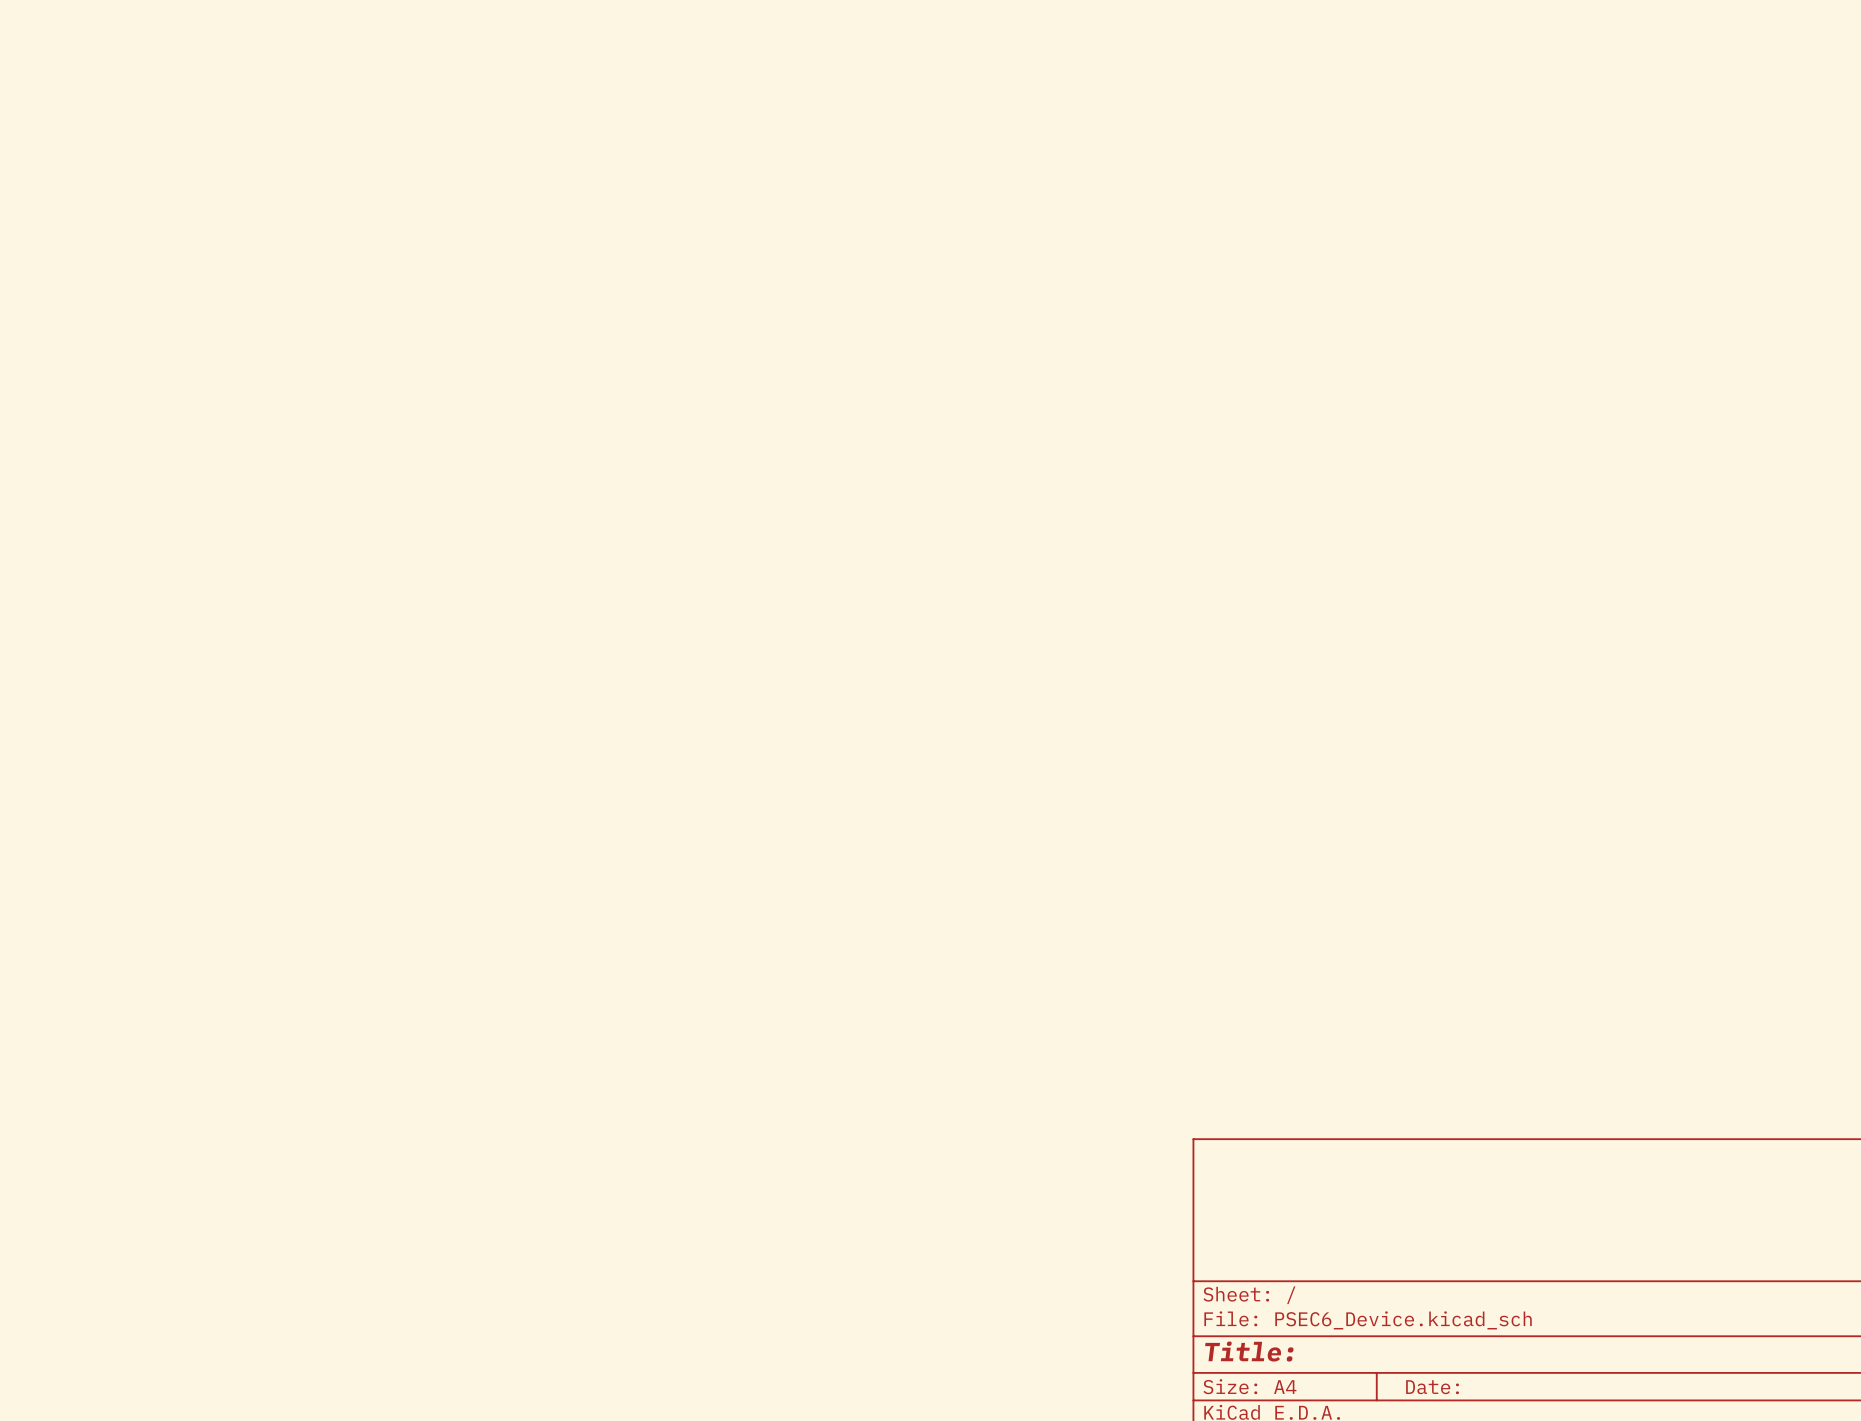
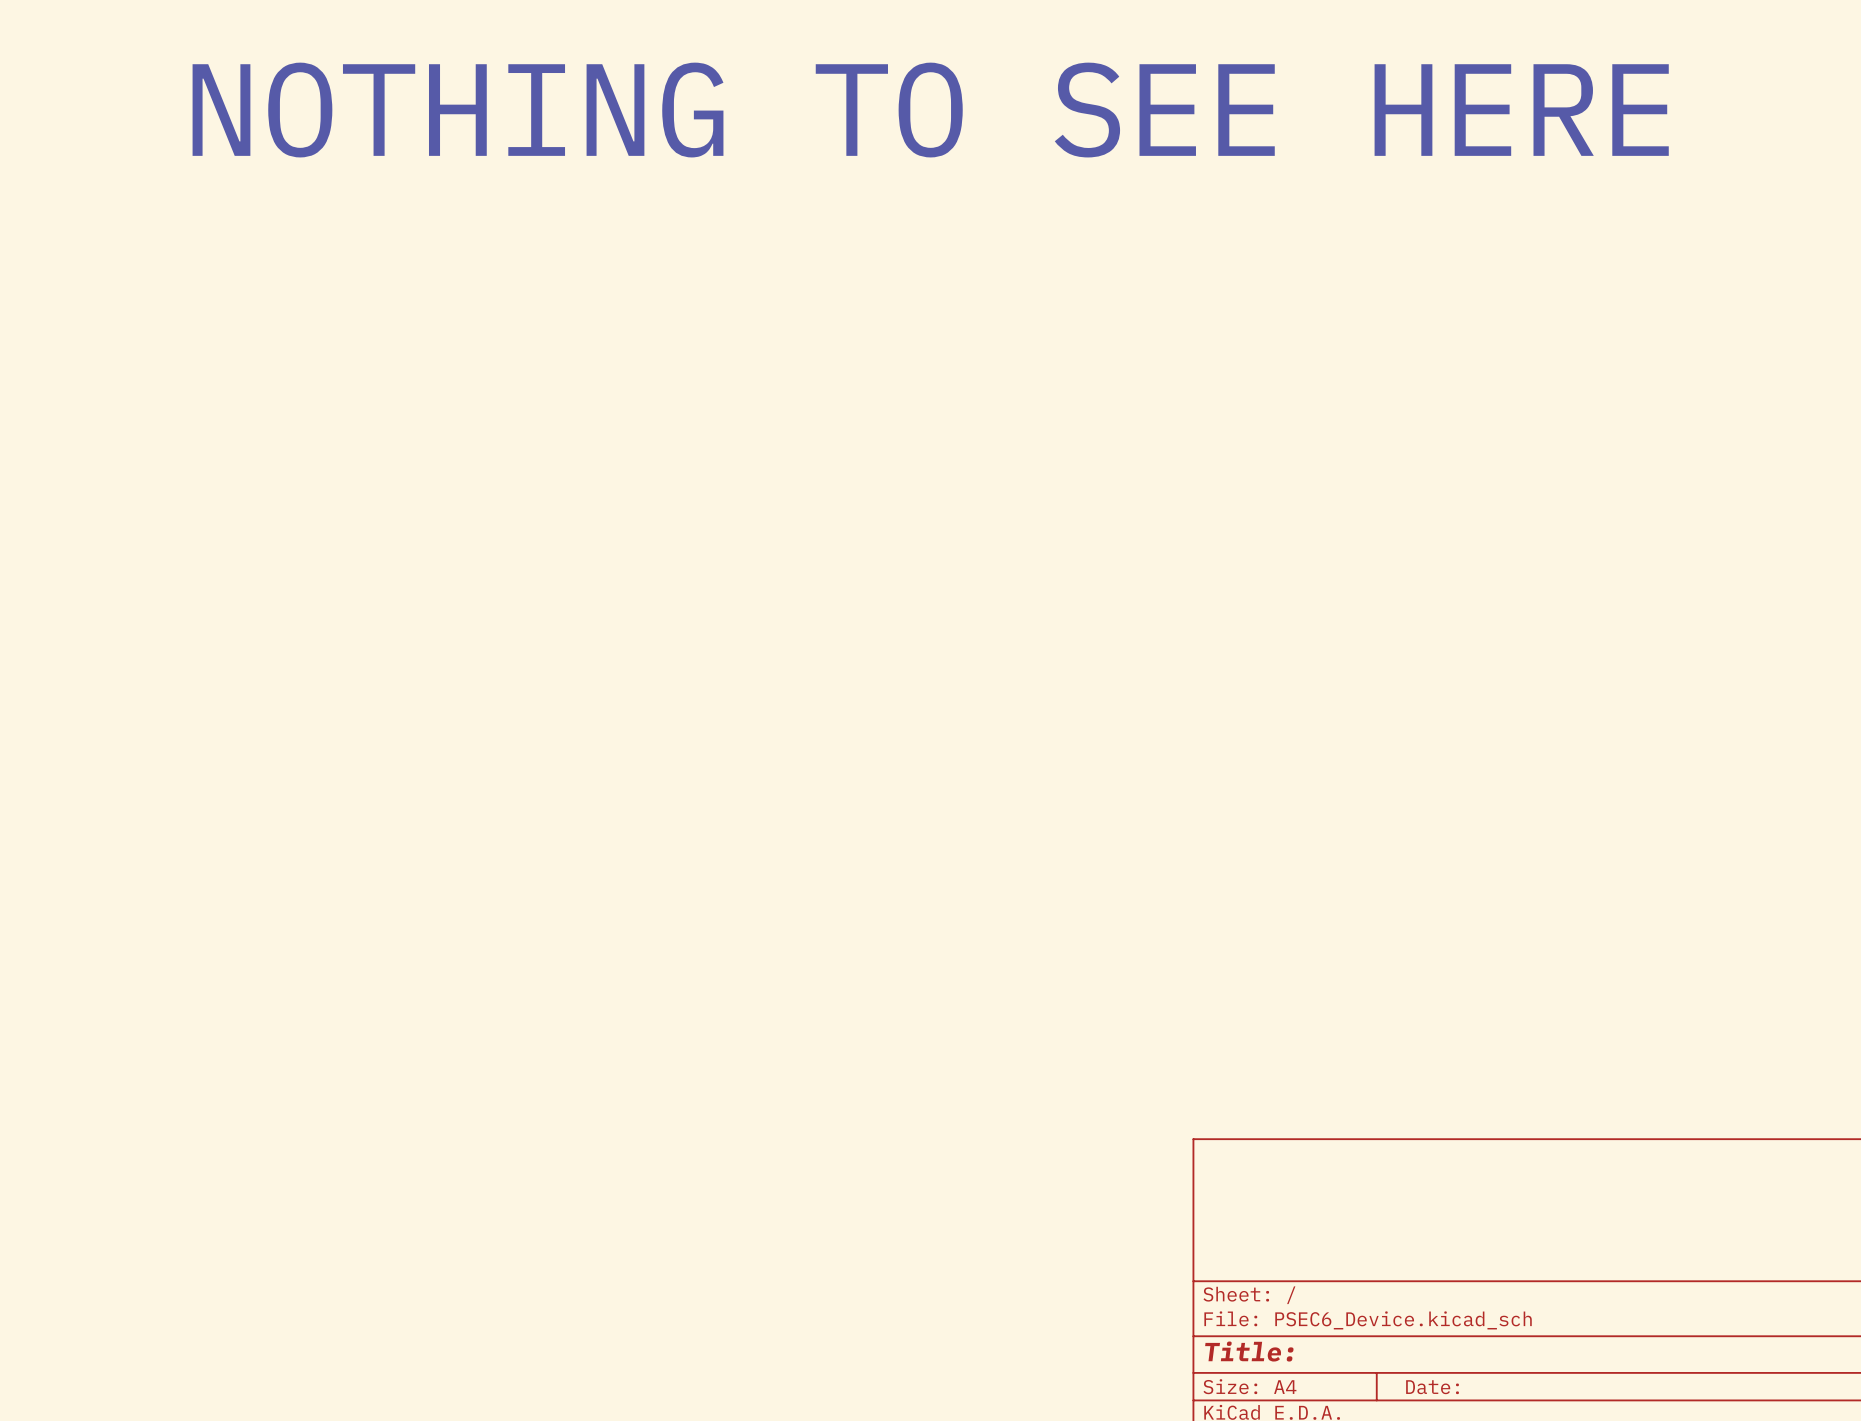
text: none -> NOTHING TO SEE HERE (930, 110)

